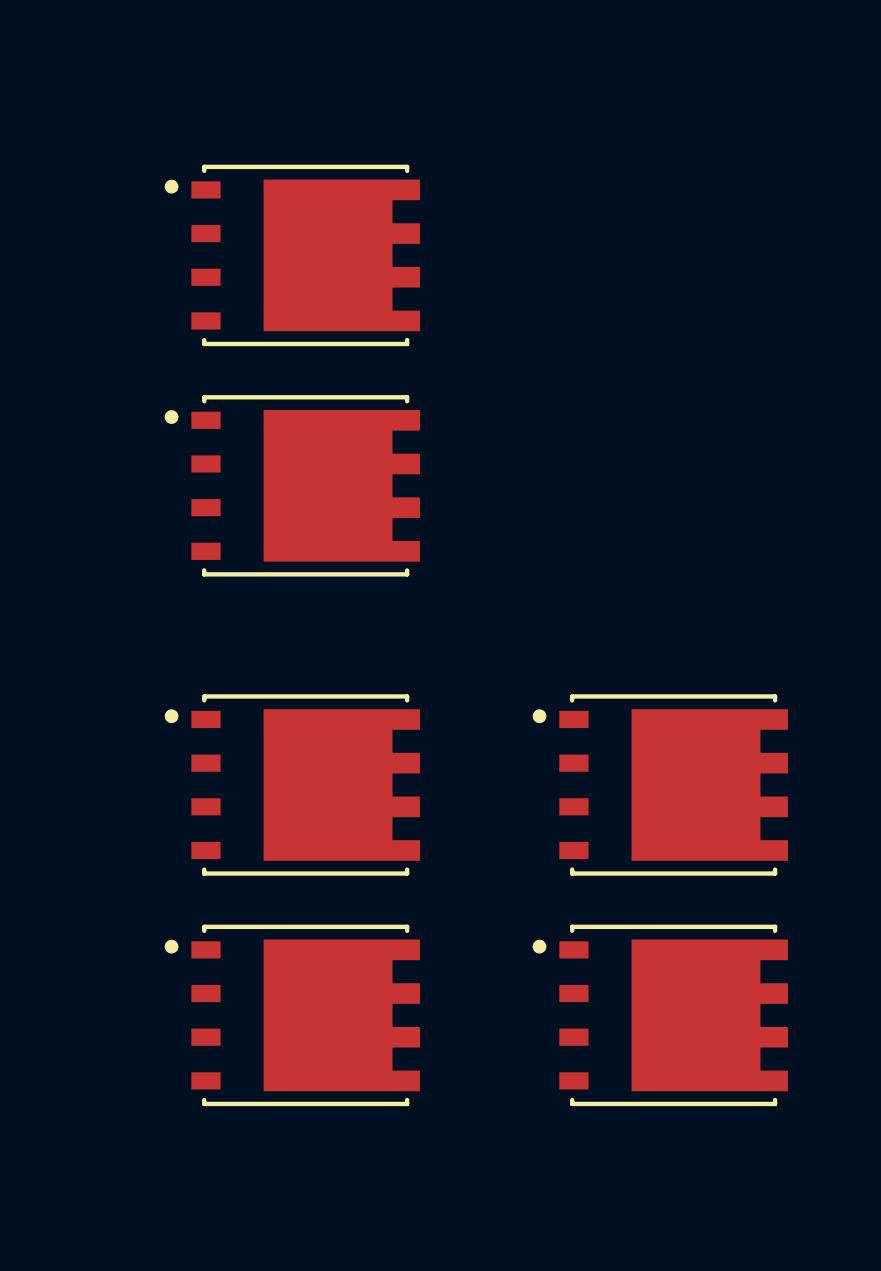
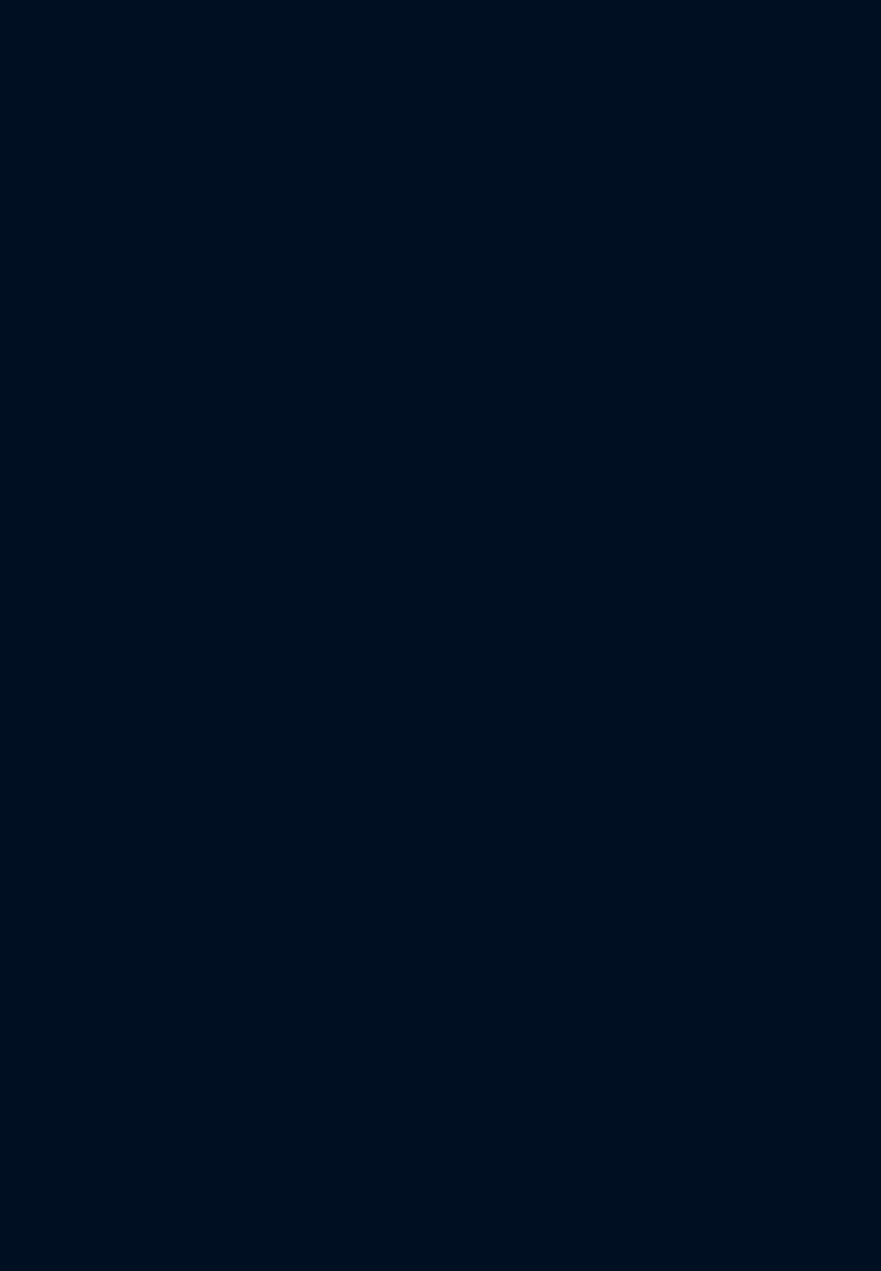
part: (292, 255) -> none
part: (292, 485) -> none
part: (292, 784) -> none
part: (660, 784) -> none
part: (292, 1015) -> none
part: (660, 1015) -> none

